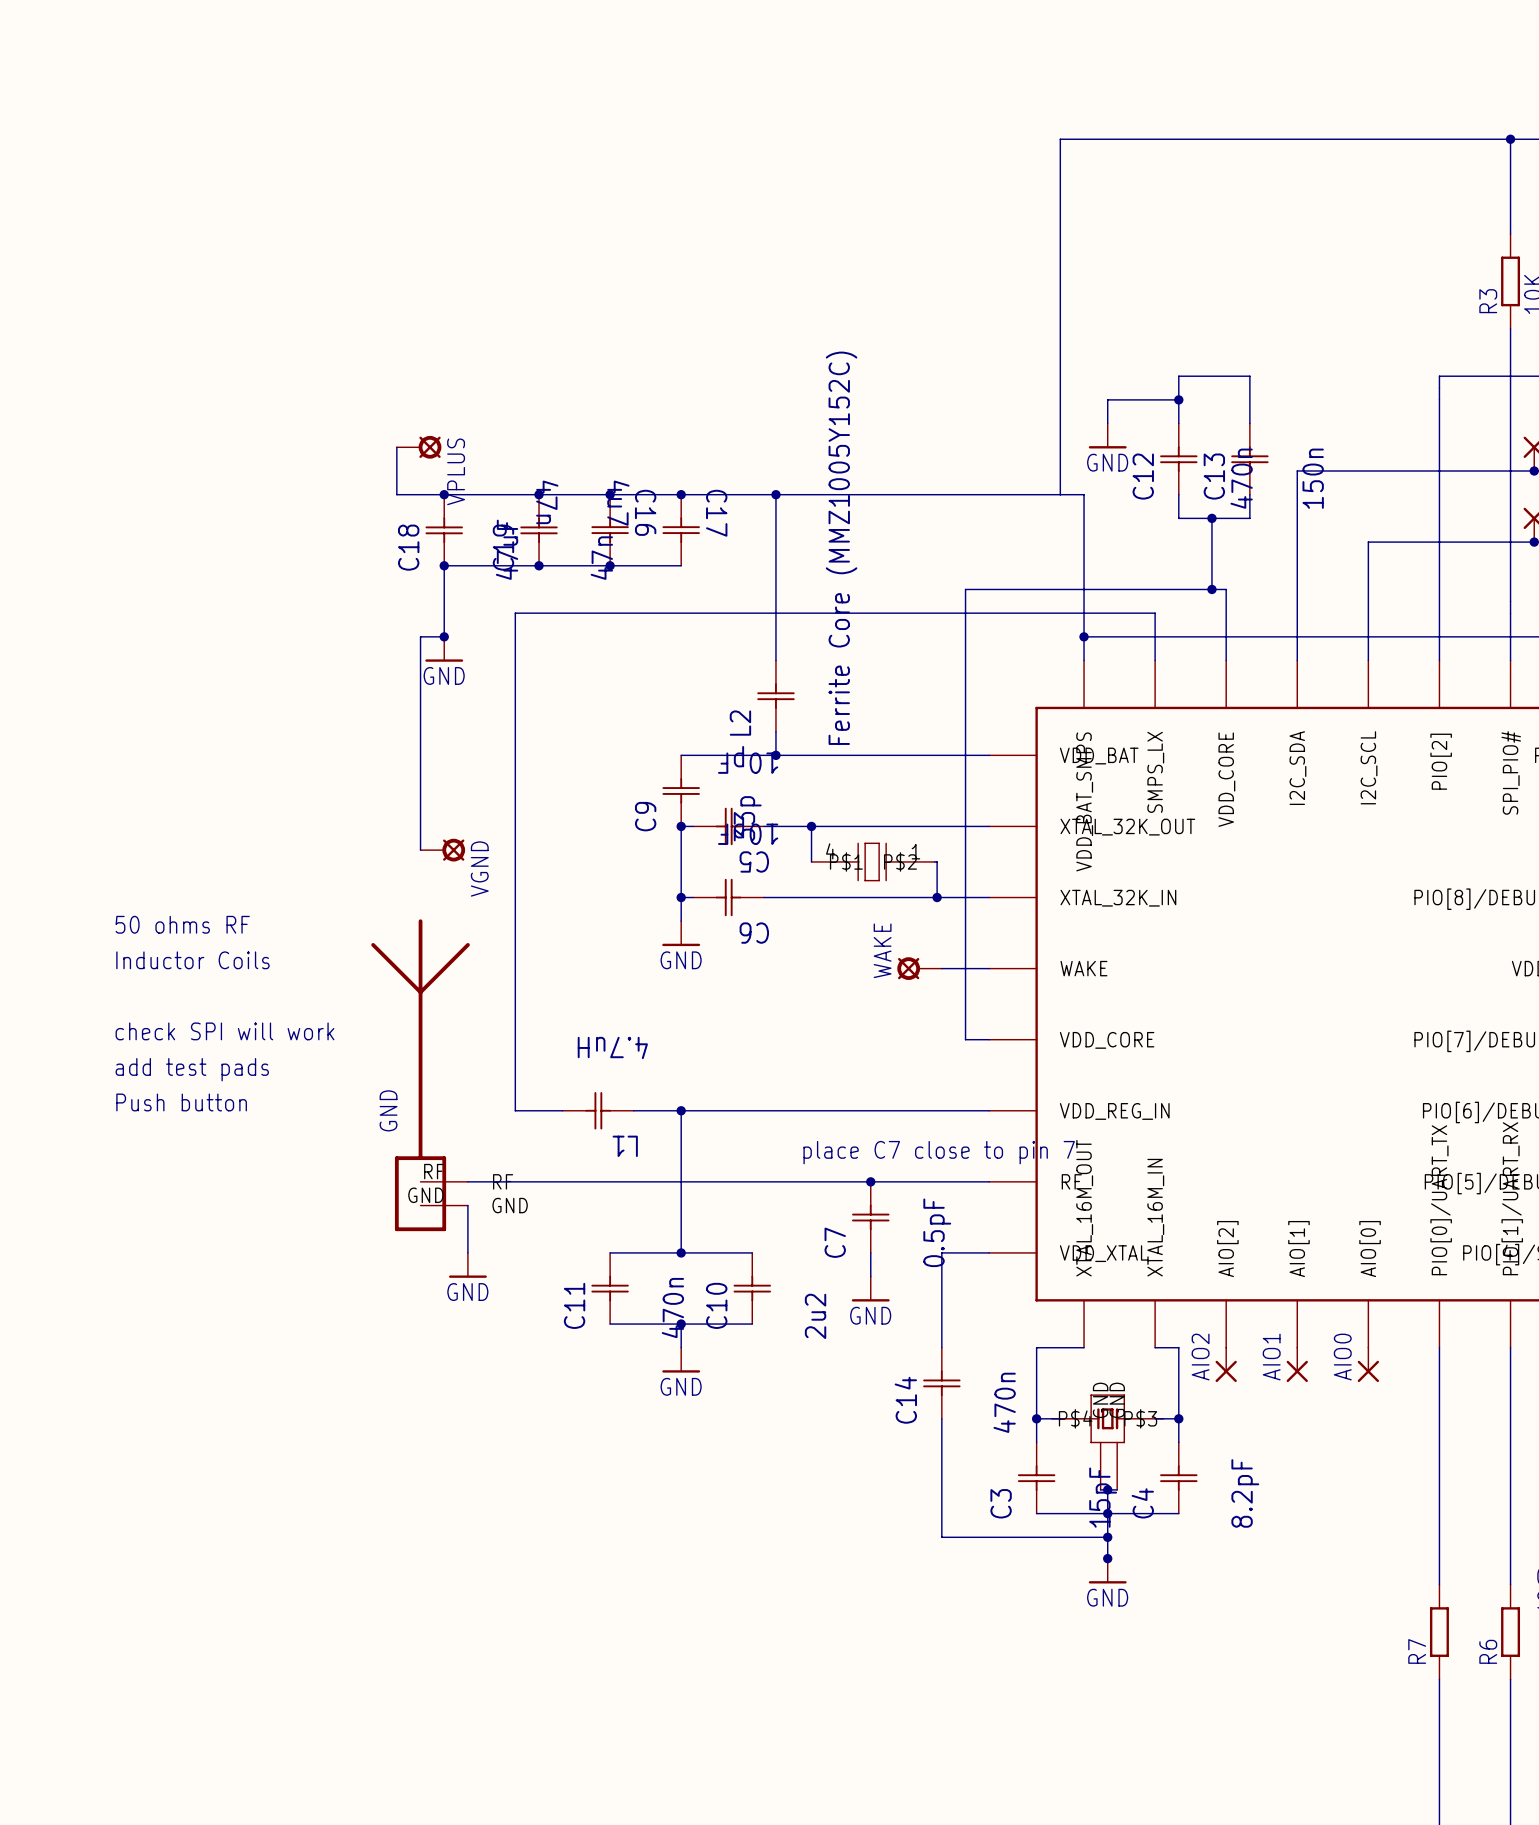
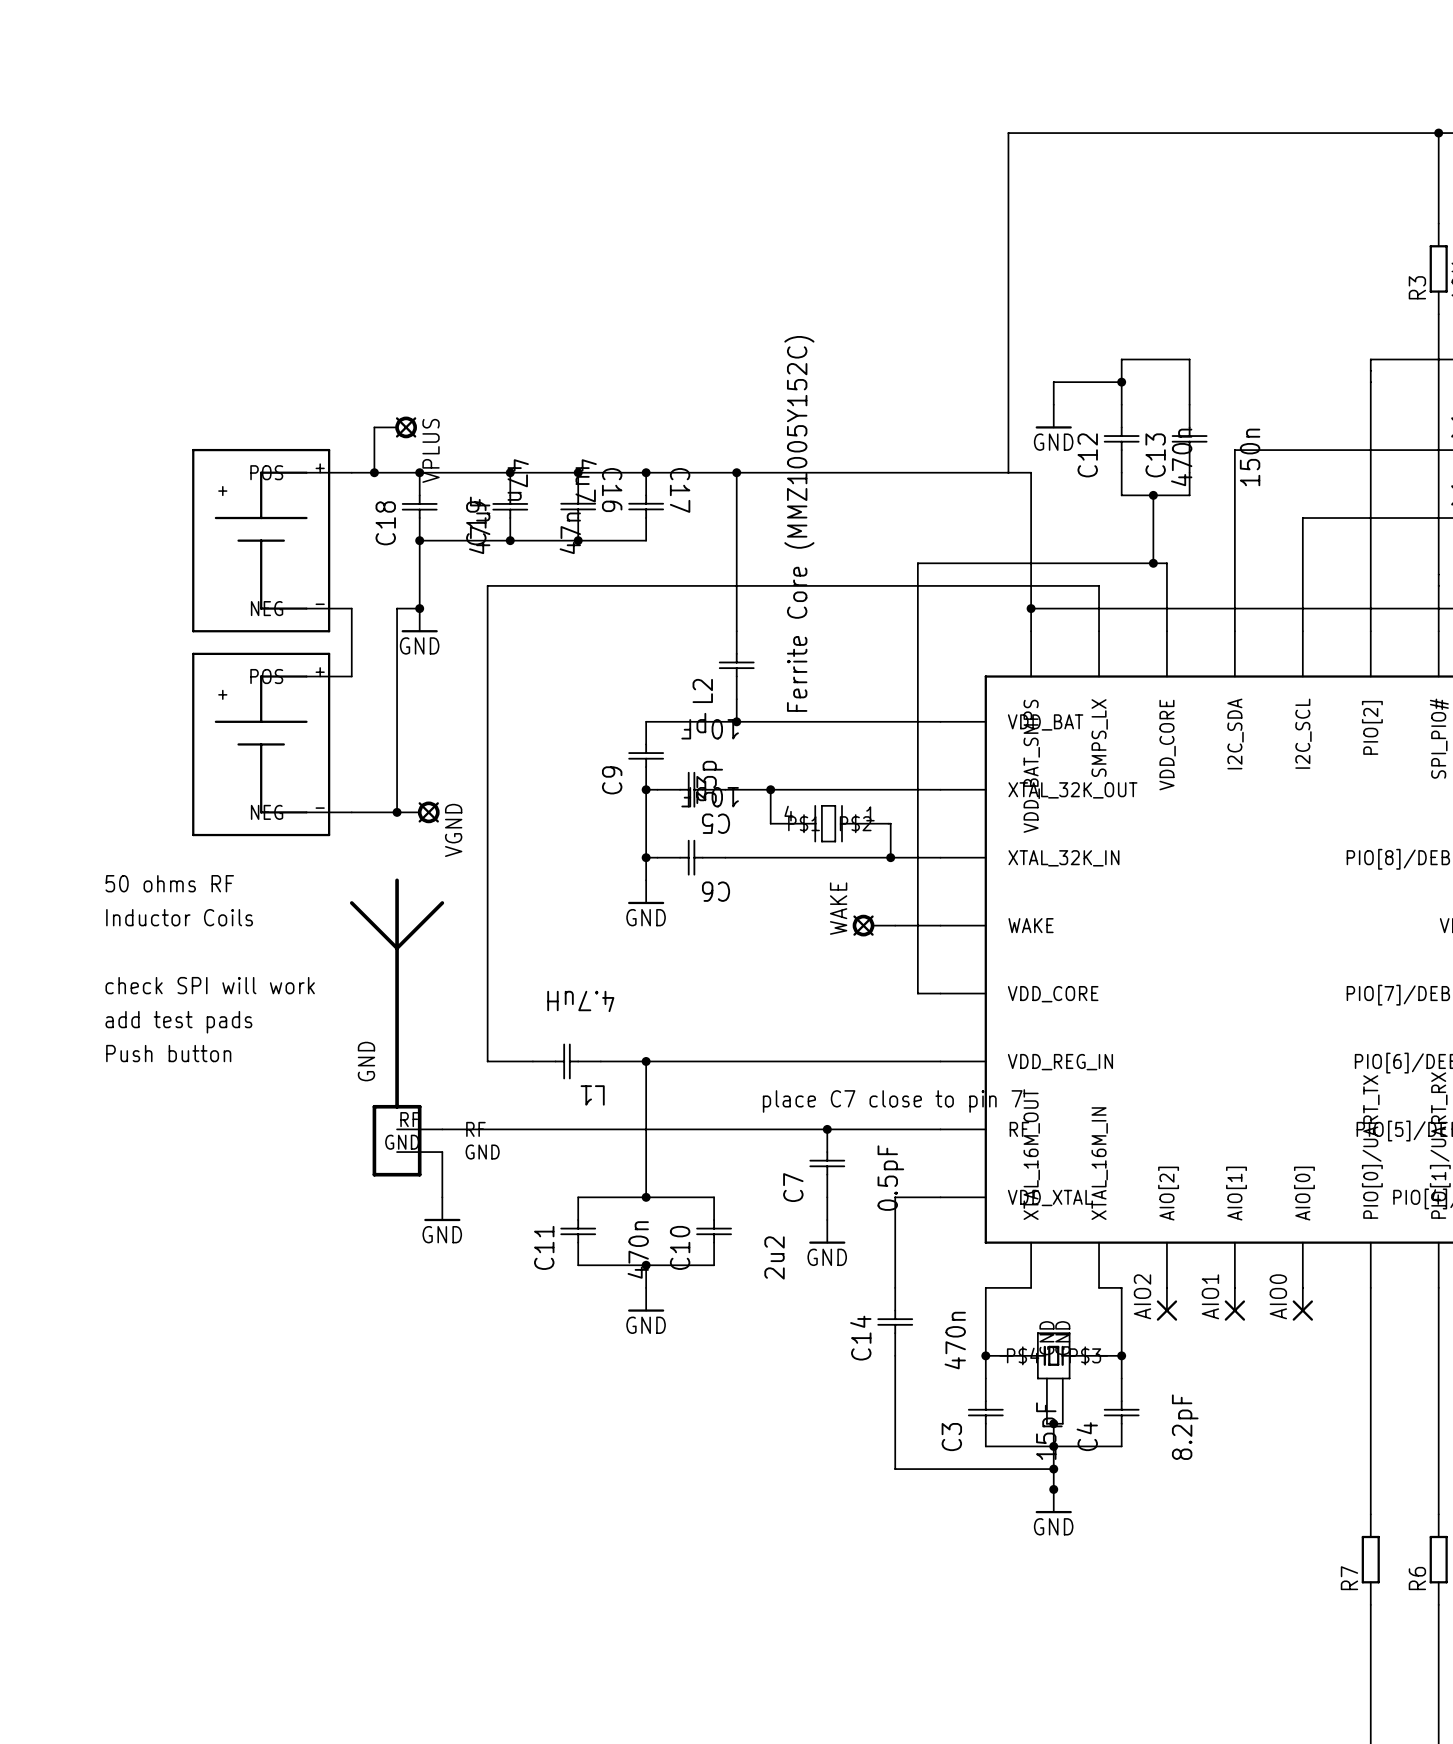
wire: none -> (351, 472) (374, 472)
junction: none -> (374, 472)
part: none -> (271, 540)
wire: none -> (351, 608) (351, 676)
part: none -> (271, 744)
wire: none -> (351, 812) (397, 812)
junction: none -> (397, 812)

